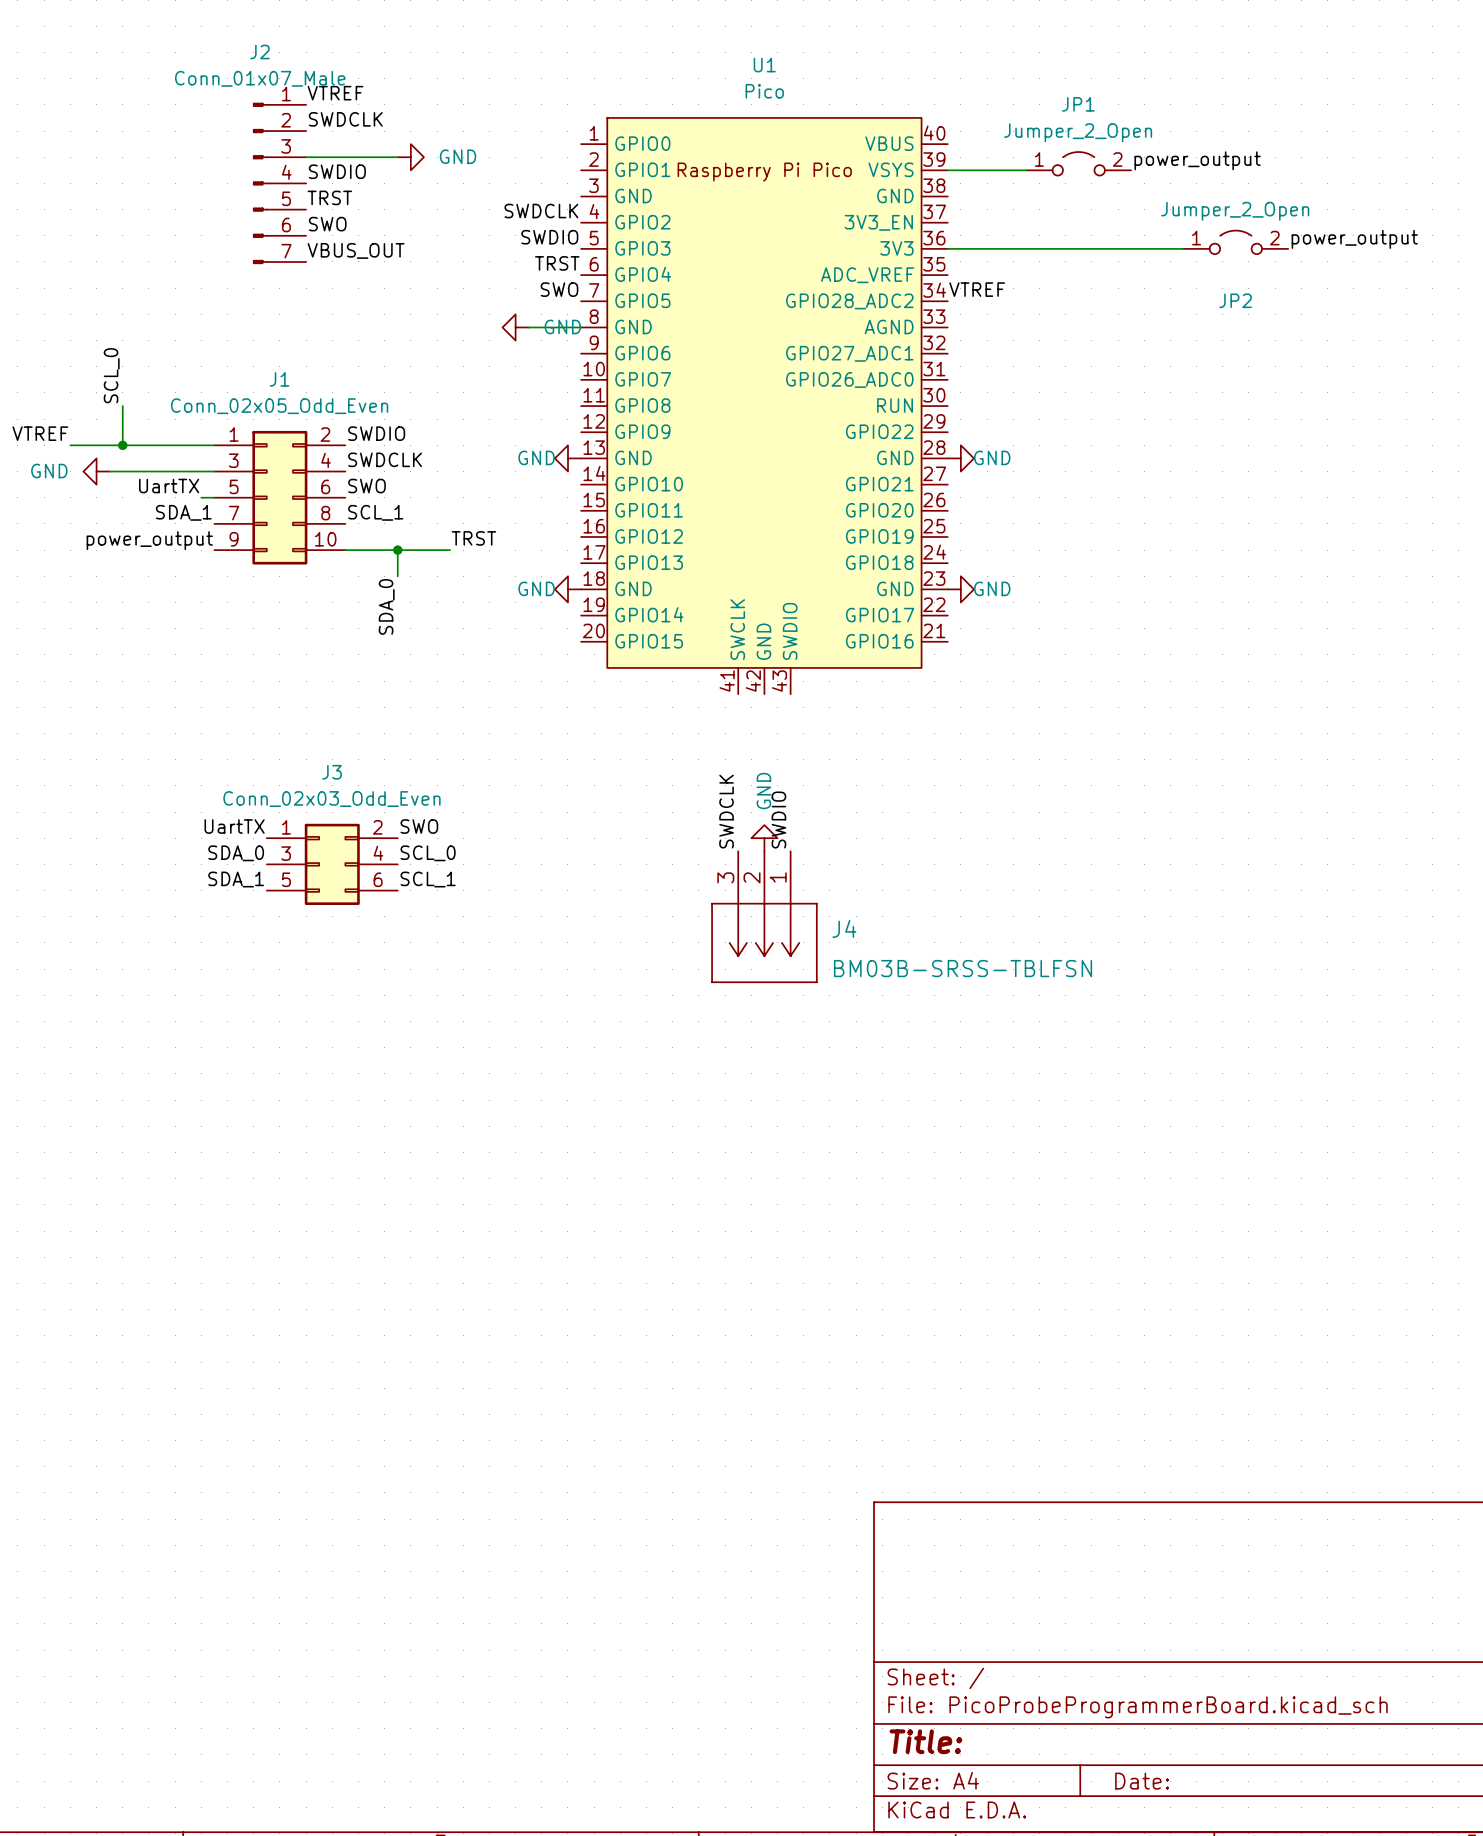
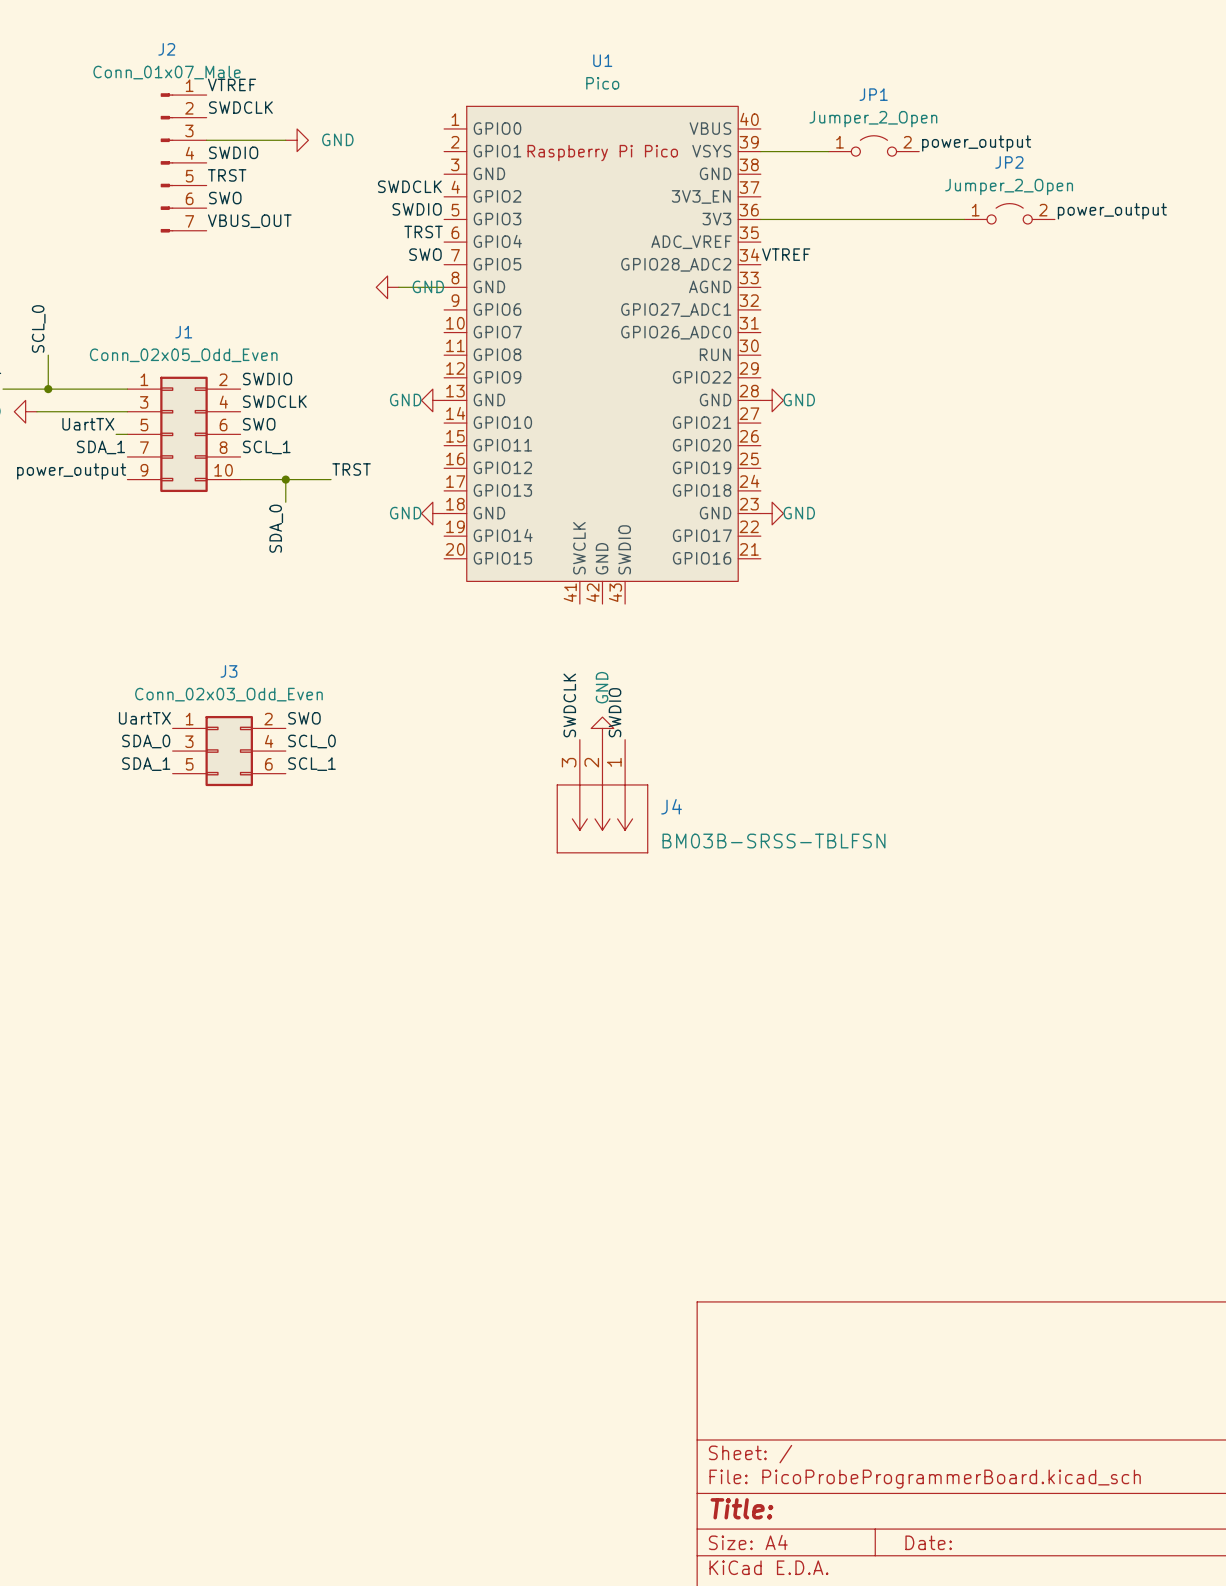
JP2 name position: JP2 (1235, 300) -> JP2 (1009, 162)

